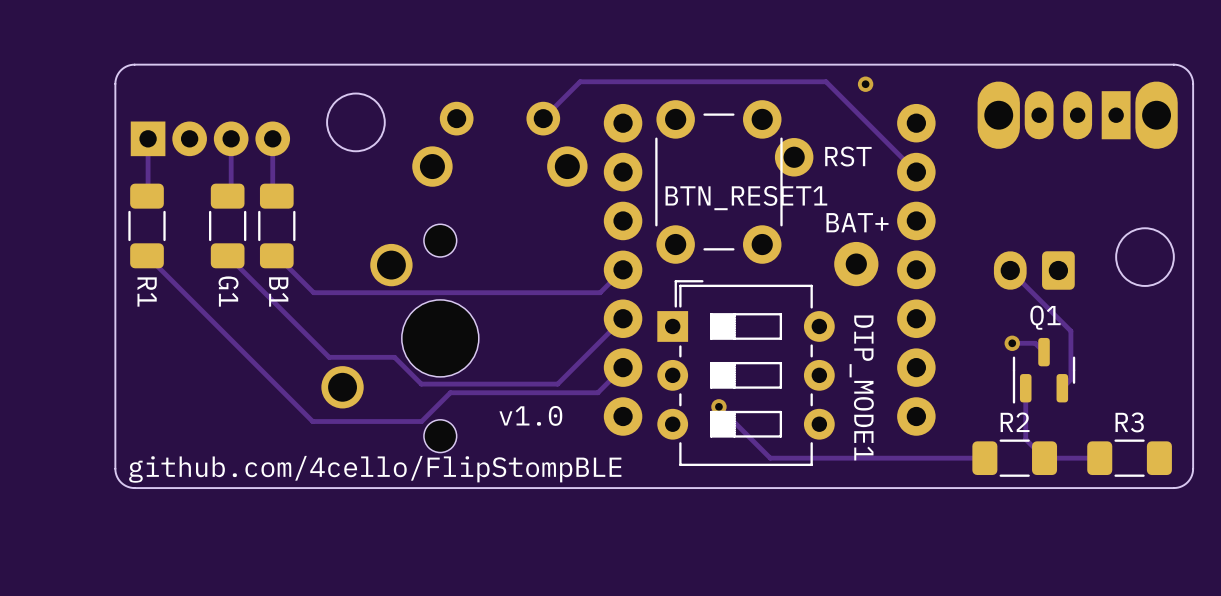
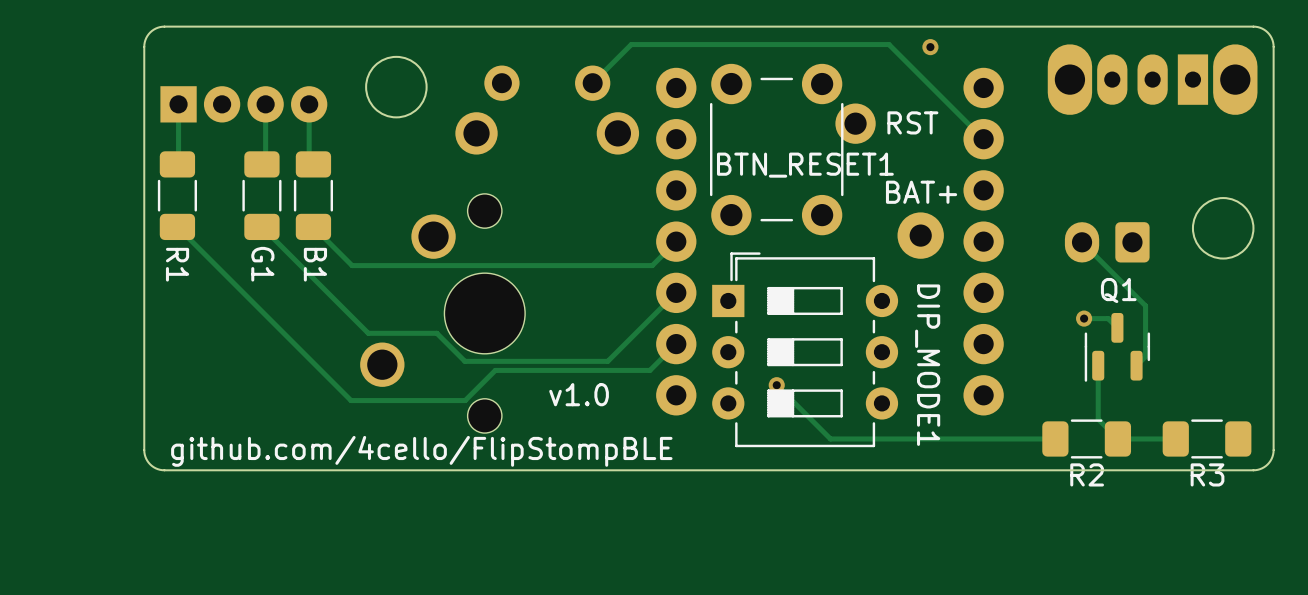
R2 name position: R2 (1015, 422) -> R2 (1087, 474)
R3 name position: R3 (1129, 422) -> R3 (1207, 474)

